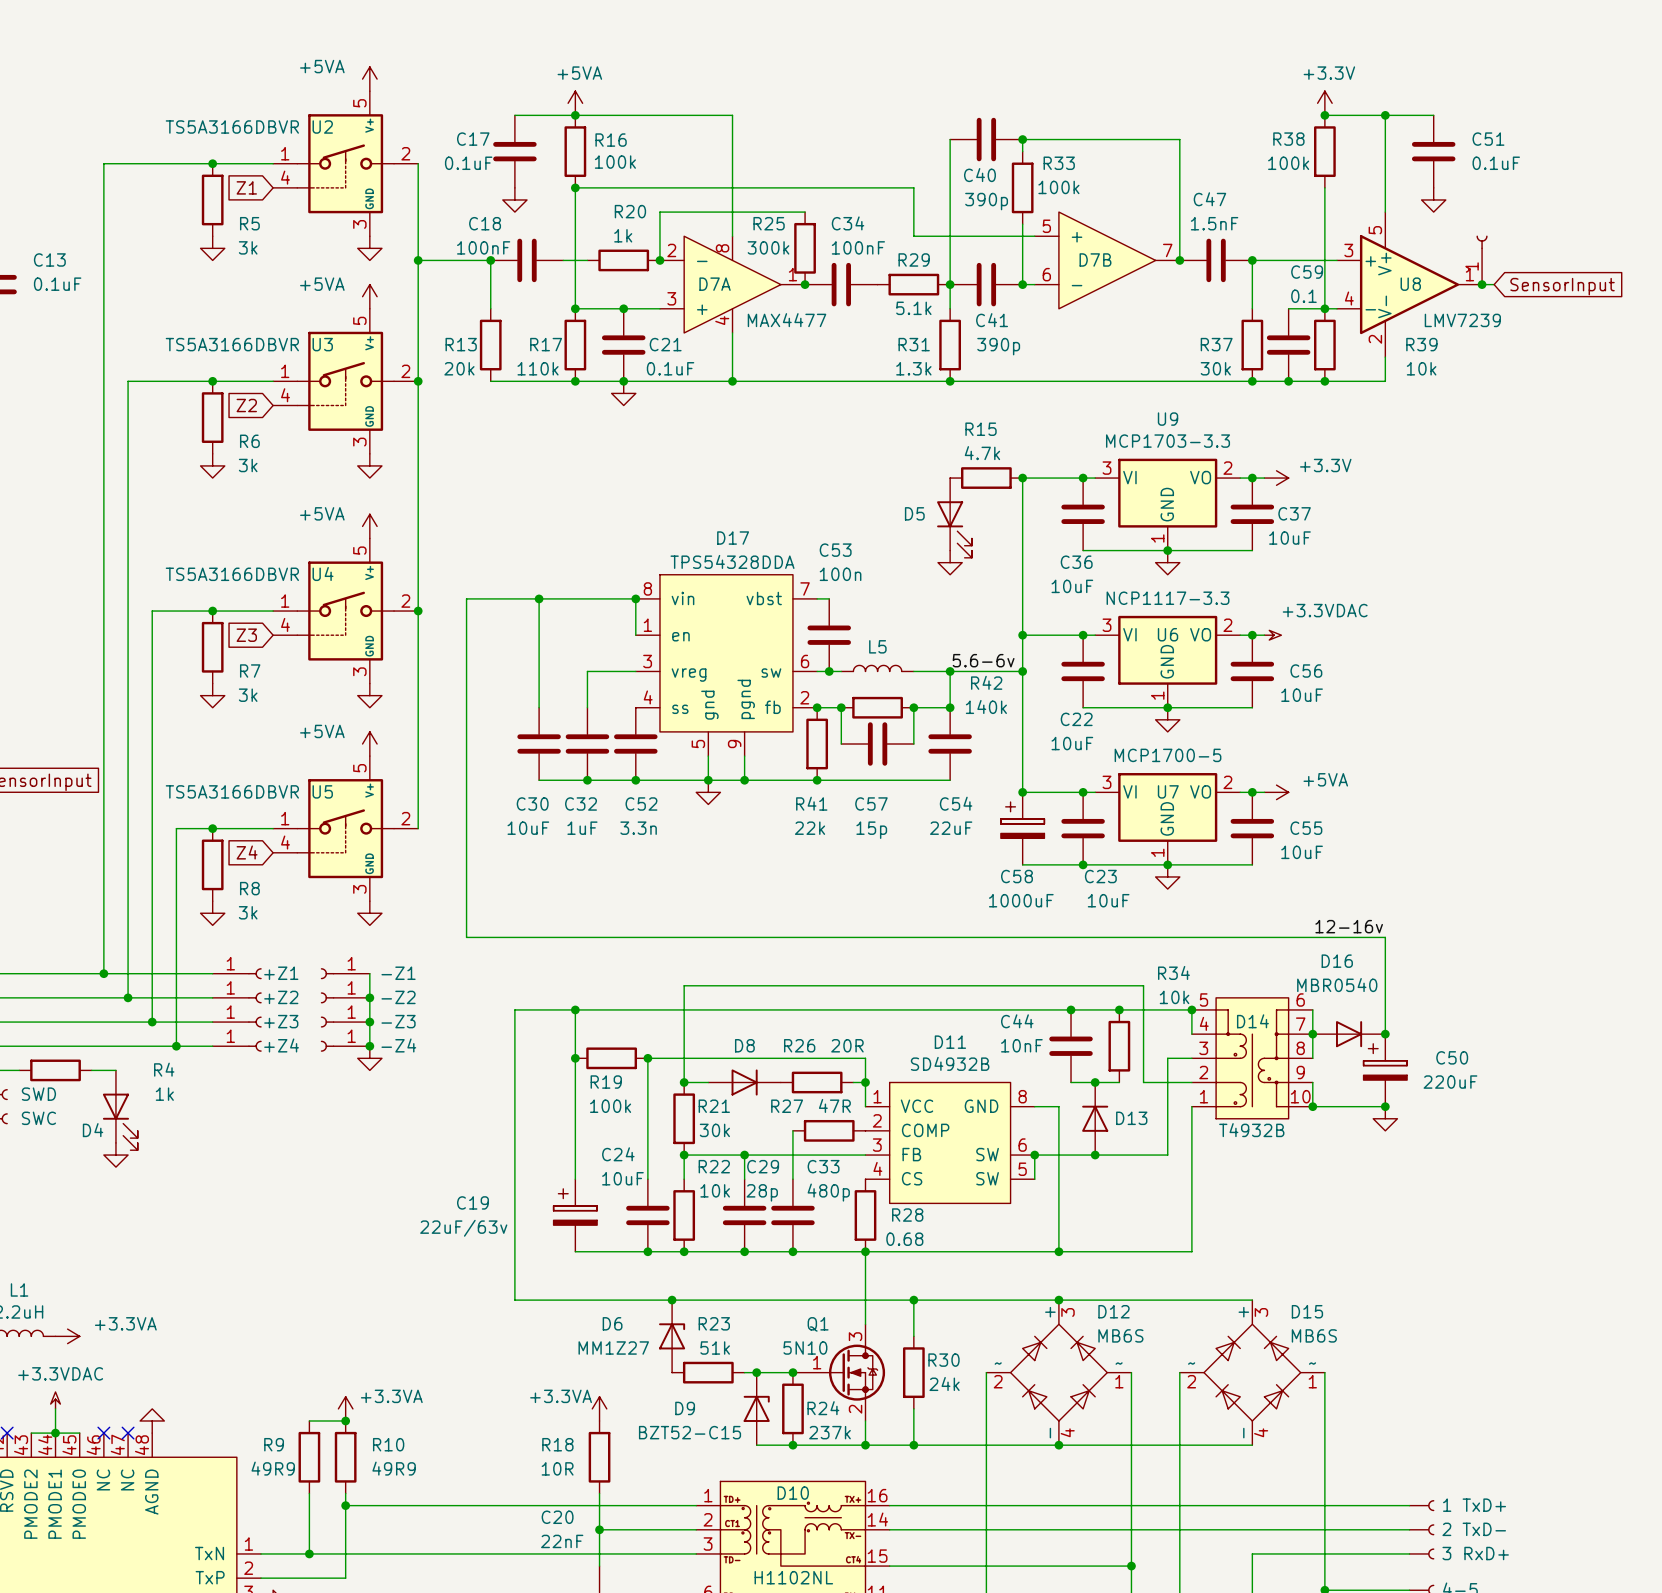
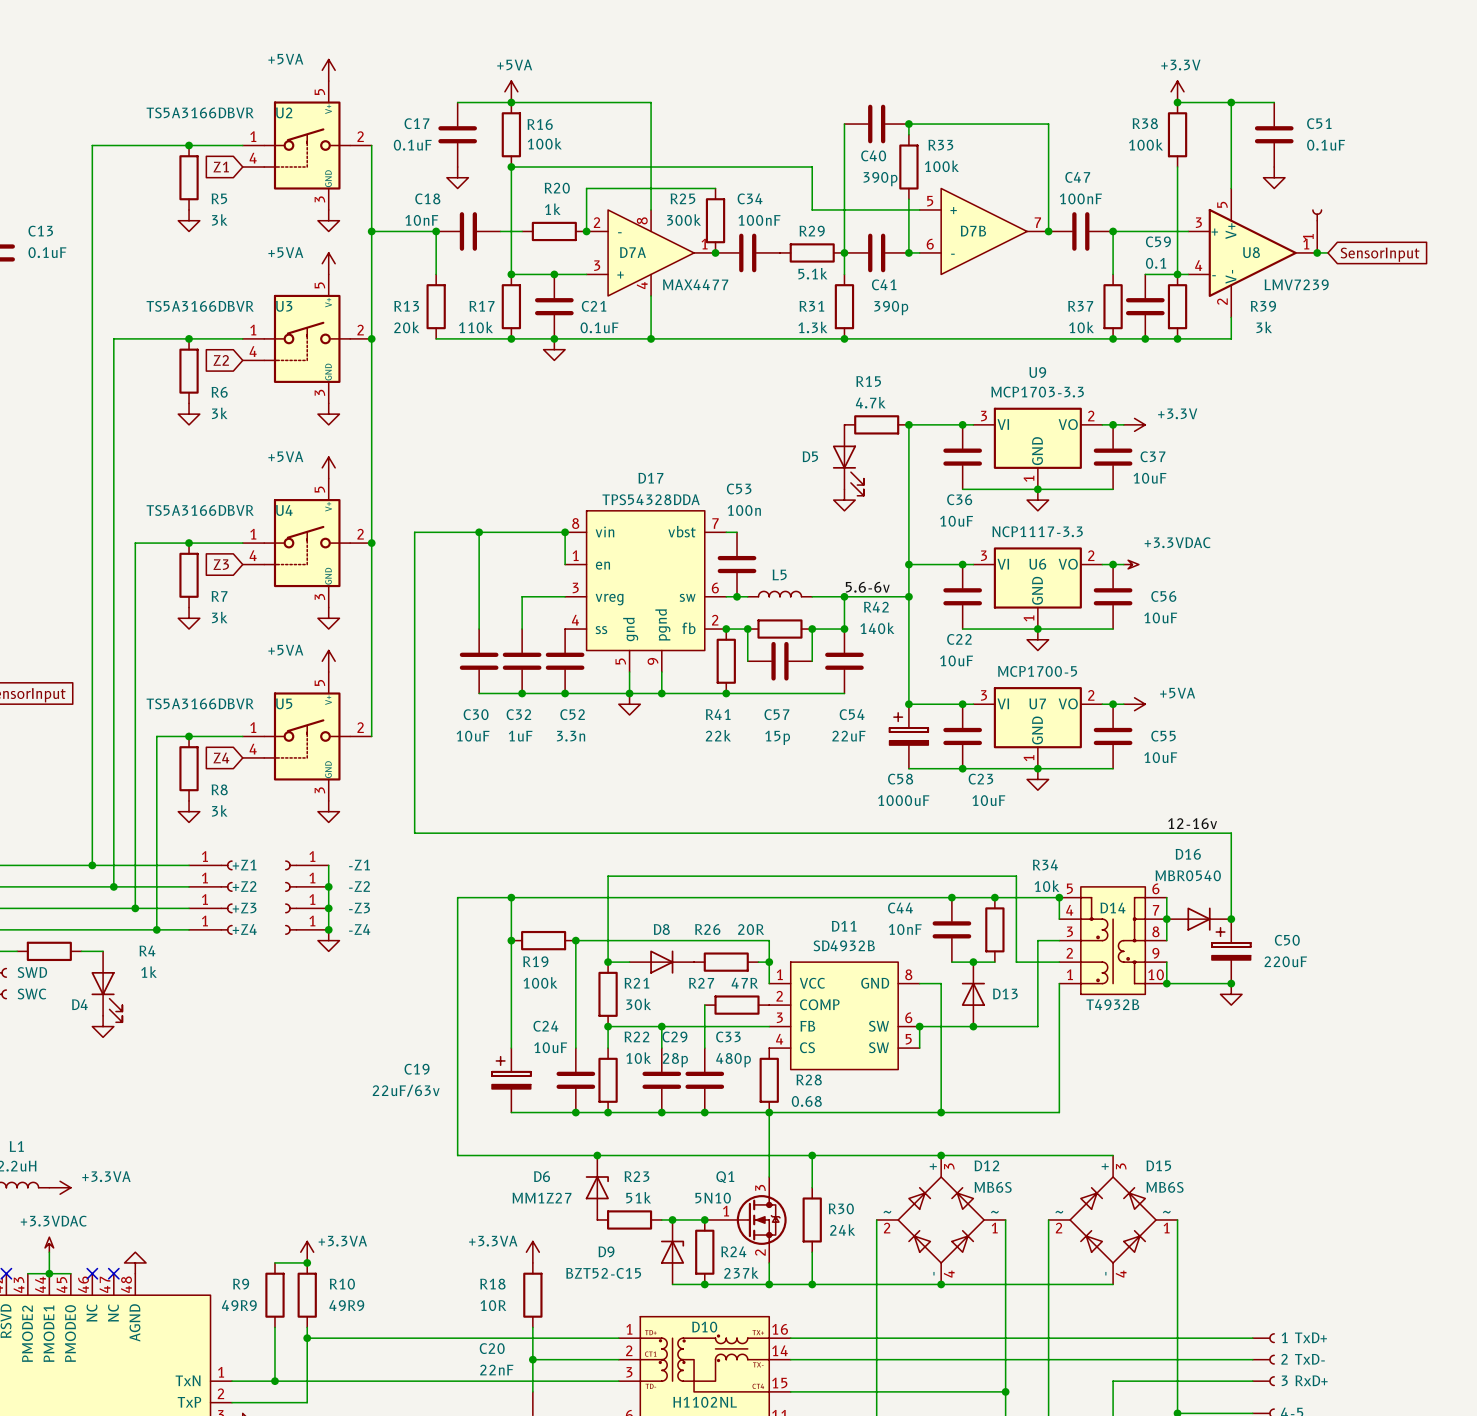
C47 value: 1.5nF (1214, 223) -> 100nF (1080, 198)
C18 value: 100nF (483, 247) -> 10nF (421, 220)
R37 value: 30k (1215, 368) -> 10k (1081, 327)
R39 value: 10k (1421, 368) -> 3k (1264, 327)

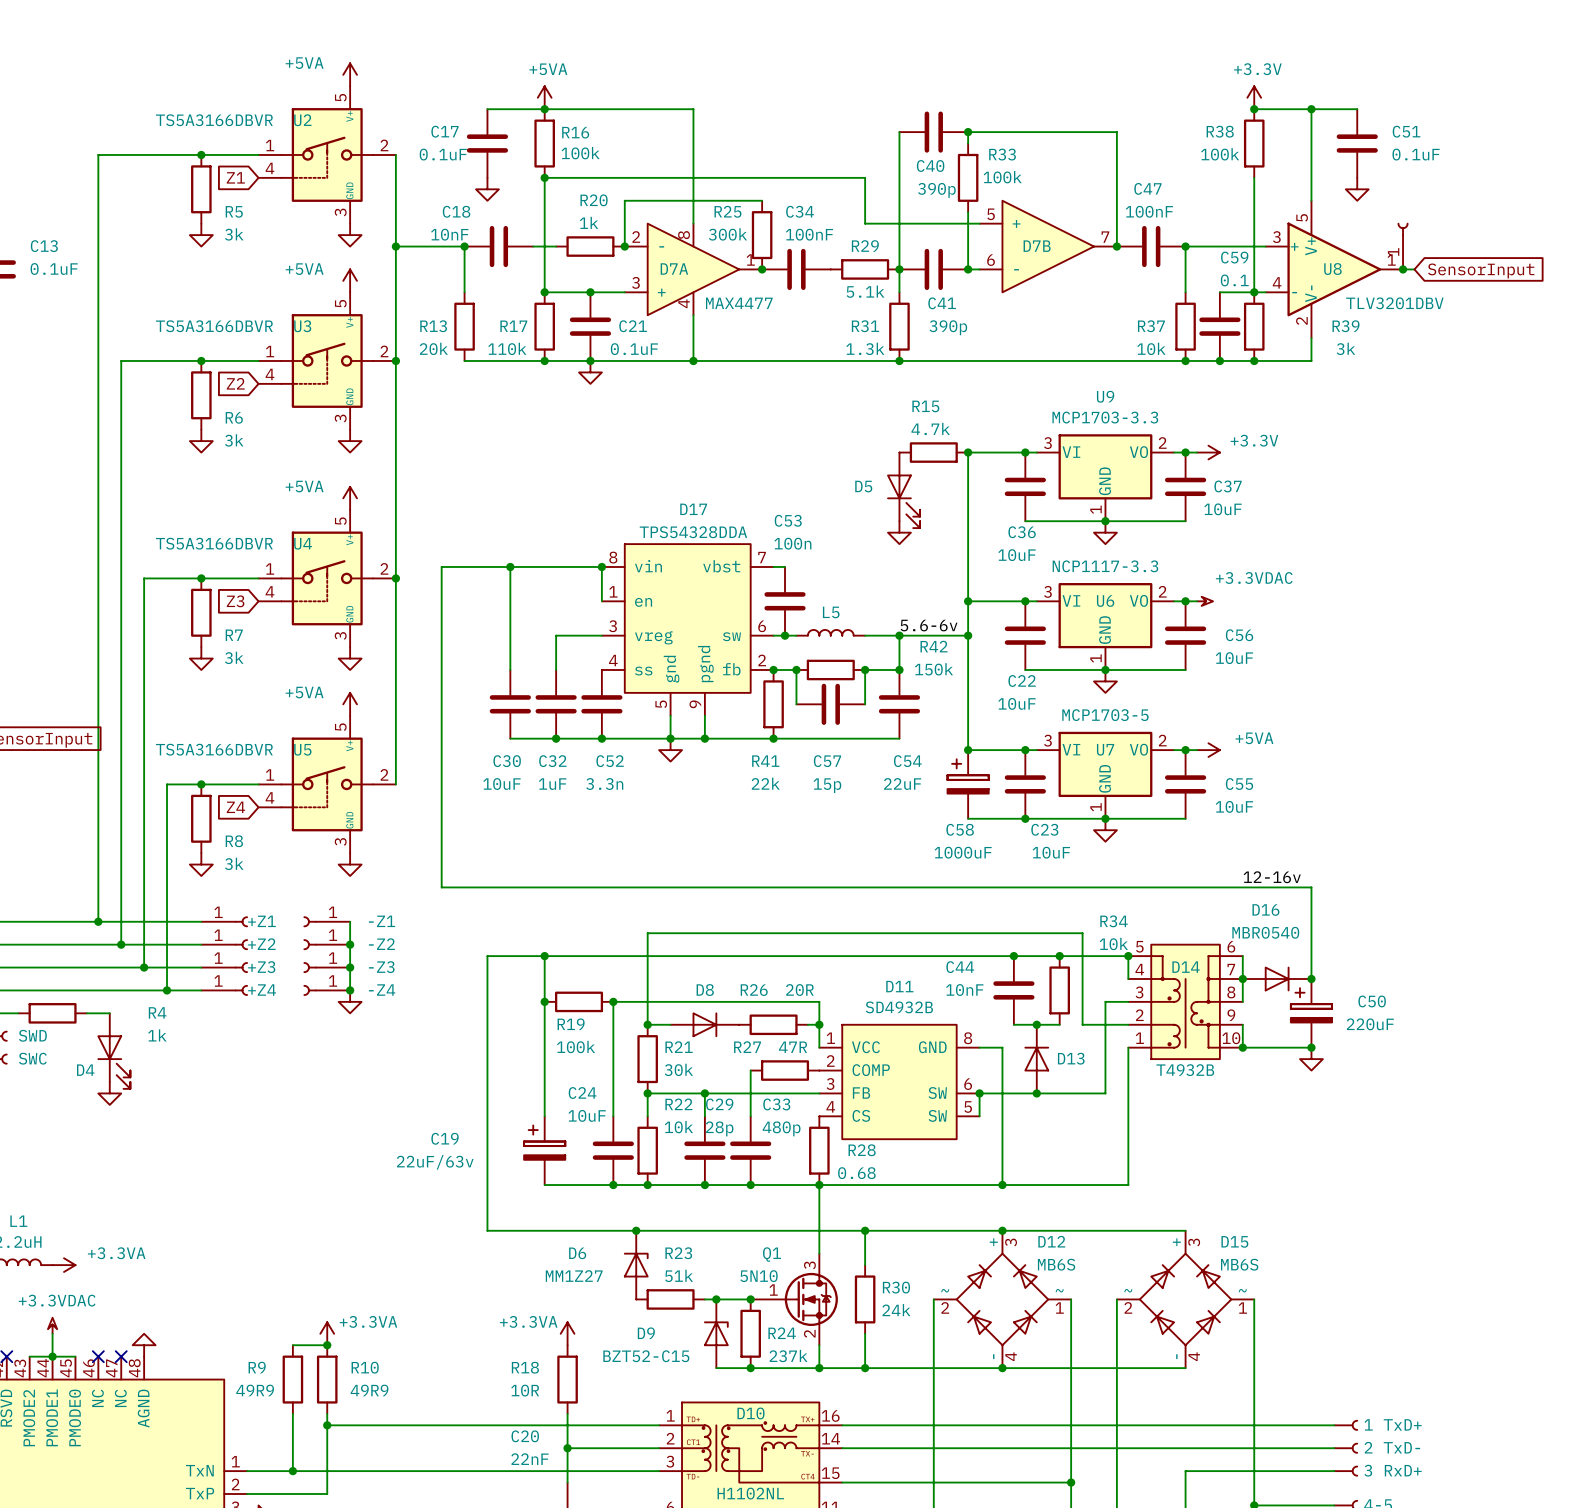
U8 value: LMV7239 (1296, 284) -> TLV3201DBV (1394, 303)
R42 value: 140k (877, 628) -> 150k (934, 669)
U7 value: MCP1700-5 (1037, 671) -> MCP1703-5 (1105, 715)

